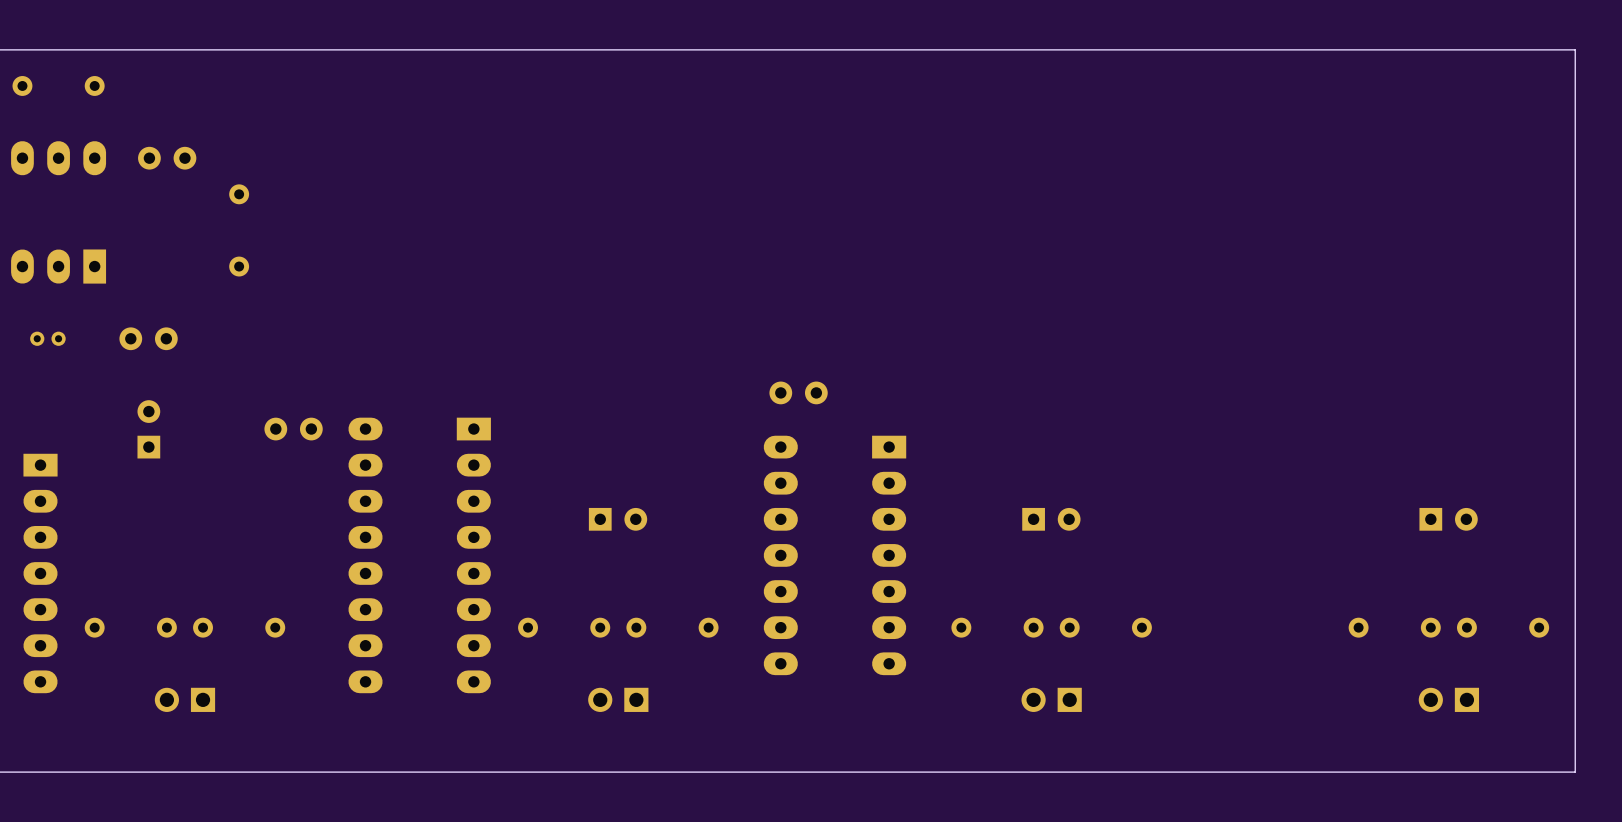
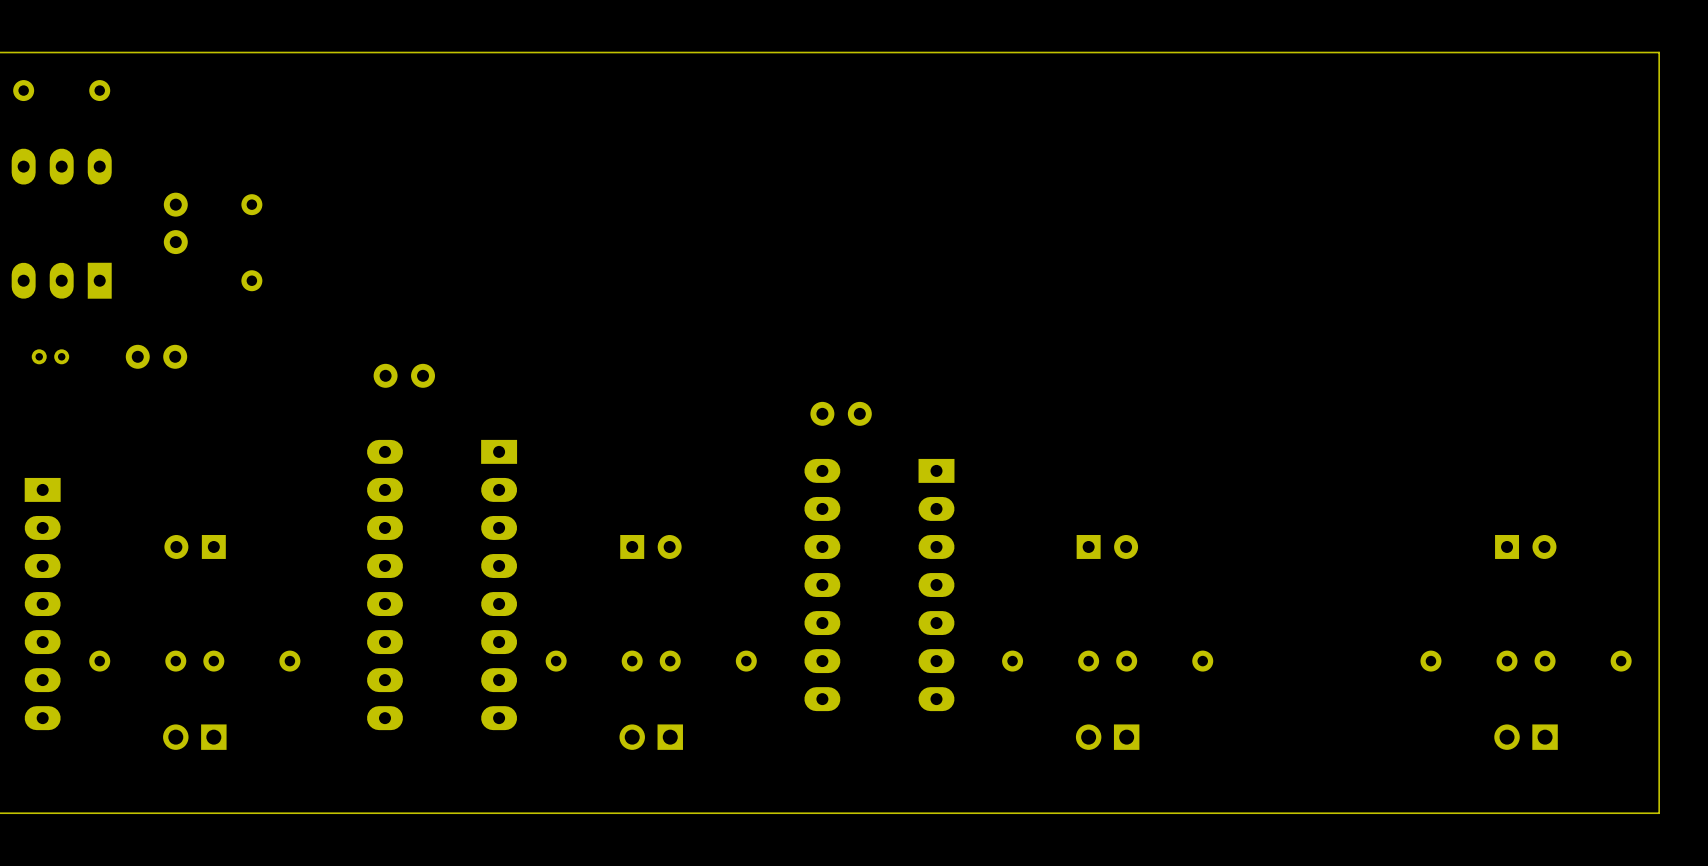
part rotation: 0° (167, 158) -> 90° clockwise (175, 223)
part position: (167, 158) -> (175, 223)
part rotation: 0° (148, 429) -> 90° counterclockwise (195, 546)
part position: (148, 429) -> (195, 546)
part position: (293, 429) -> (404, 375)

